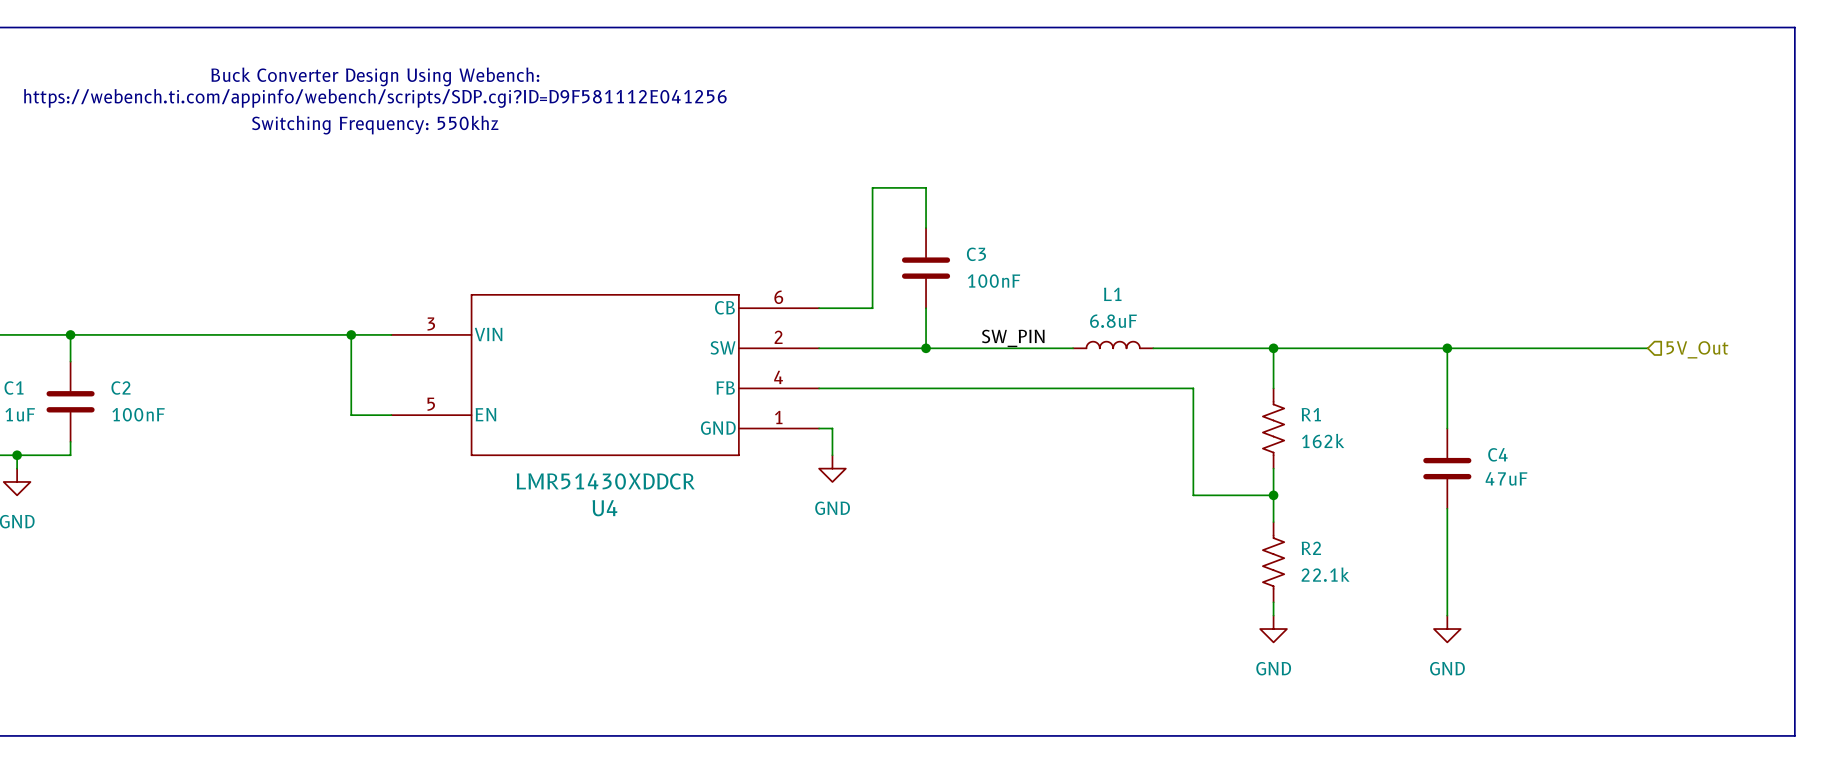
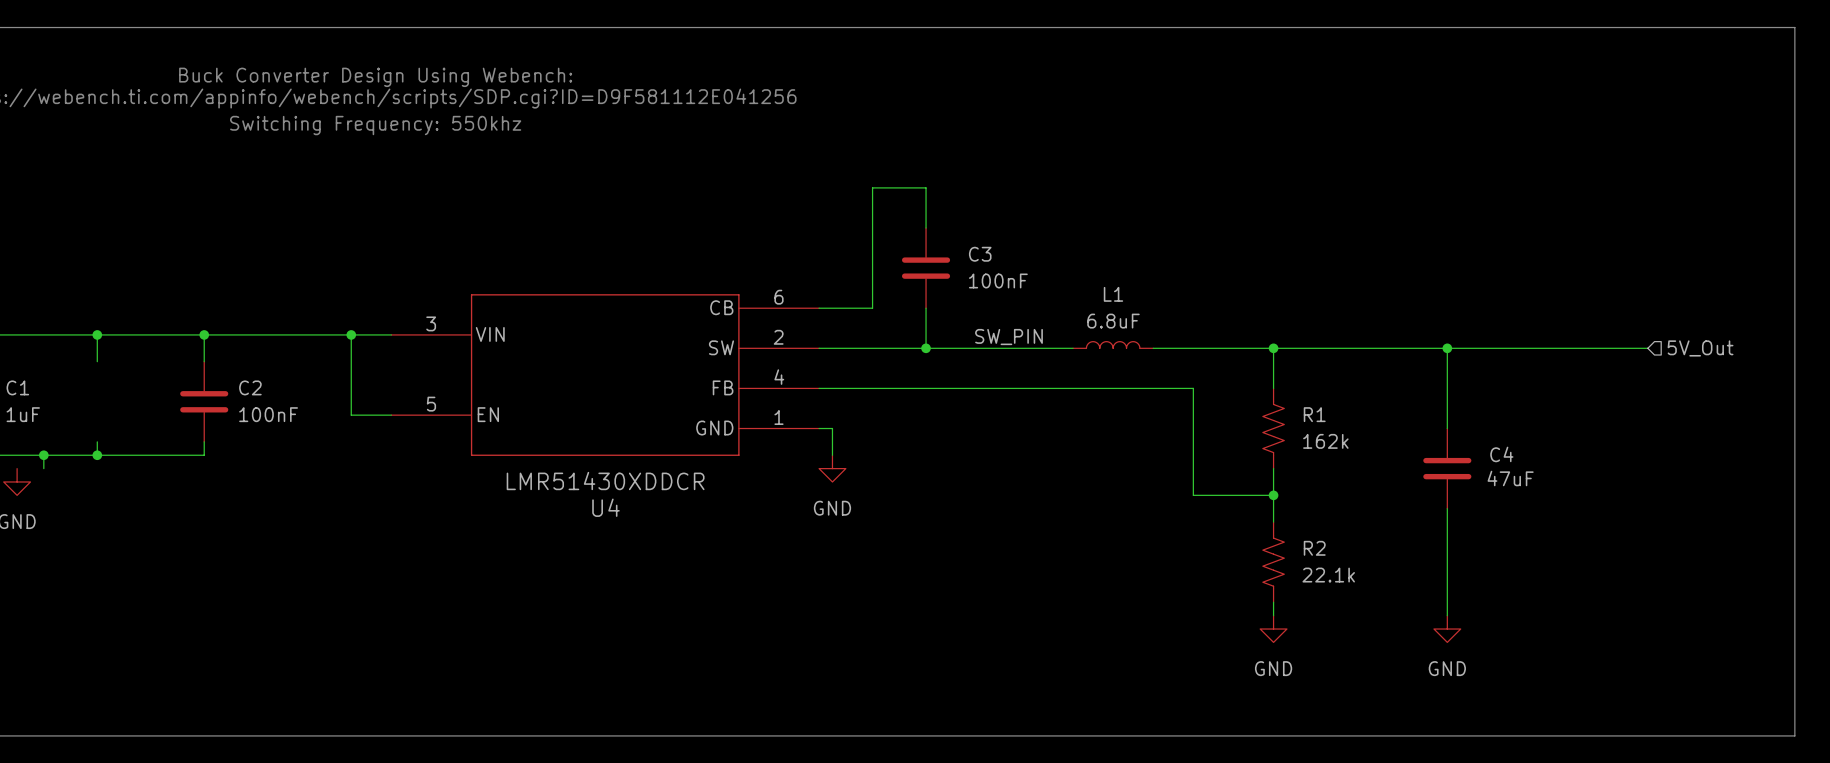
wire: (70, 334) (70, 361) -> (97, 334) (97, 361)
junction position: (70, 334) -> (97, 334)
wire: none -> (204, 334) (204, 361)
junction: none -> (204, 334)
C2 name position: C2 (120, 388) -> C2 (250, 387)
C2 position: (70, 401) -> (204, 401)
C2 value position: 100nF (138, 414) -> 100nF (268, 414)
wire: (70, 441) (70, 455) -> (204, 441) (204, 455) (70, 455)
wire: none -> (97, 441) (97, 455)
wire: (17, 455) (17, 468) -> (43, 455) (43, 468)
junction: (17, 455) -> none
junction: none -> (43, 455)
junction: none -> (97, 455)

